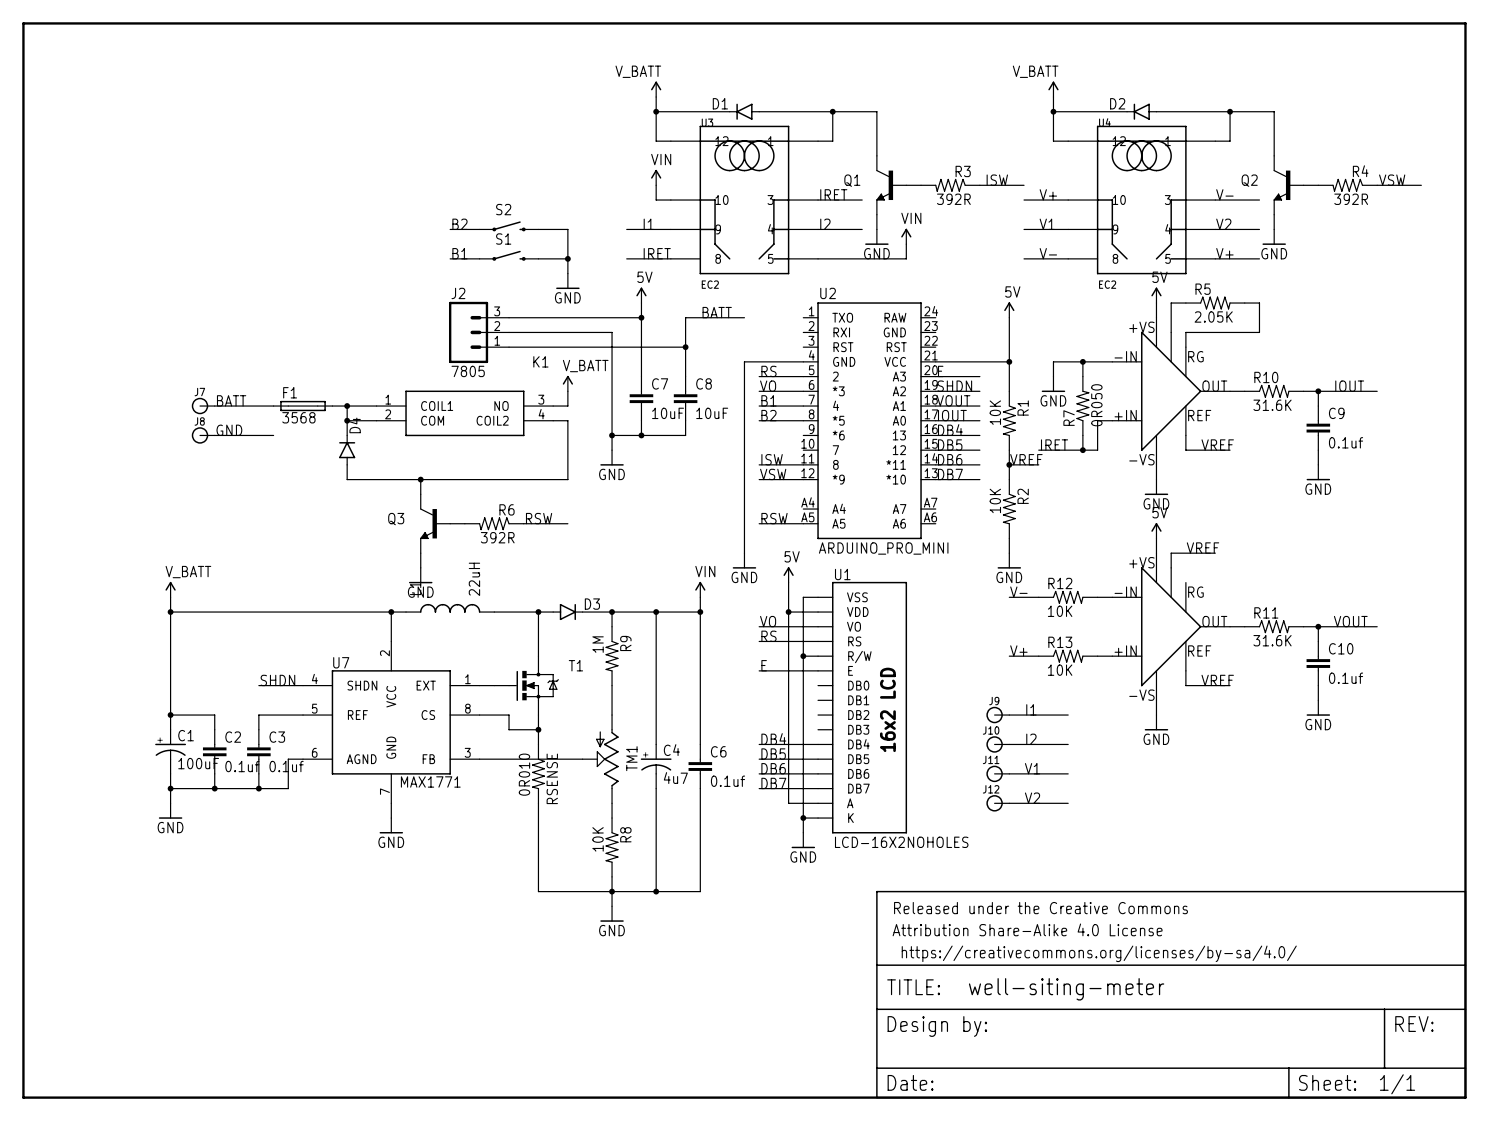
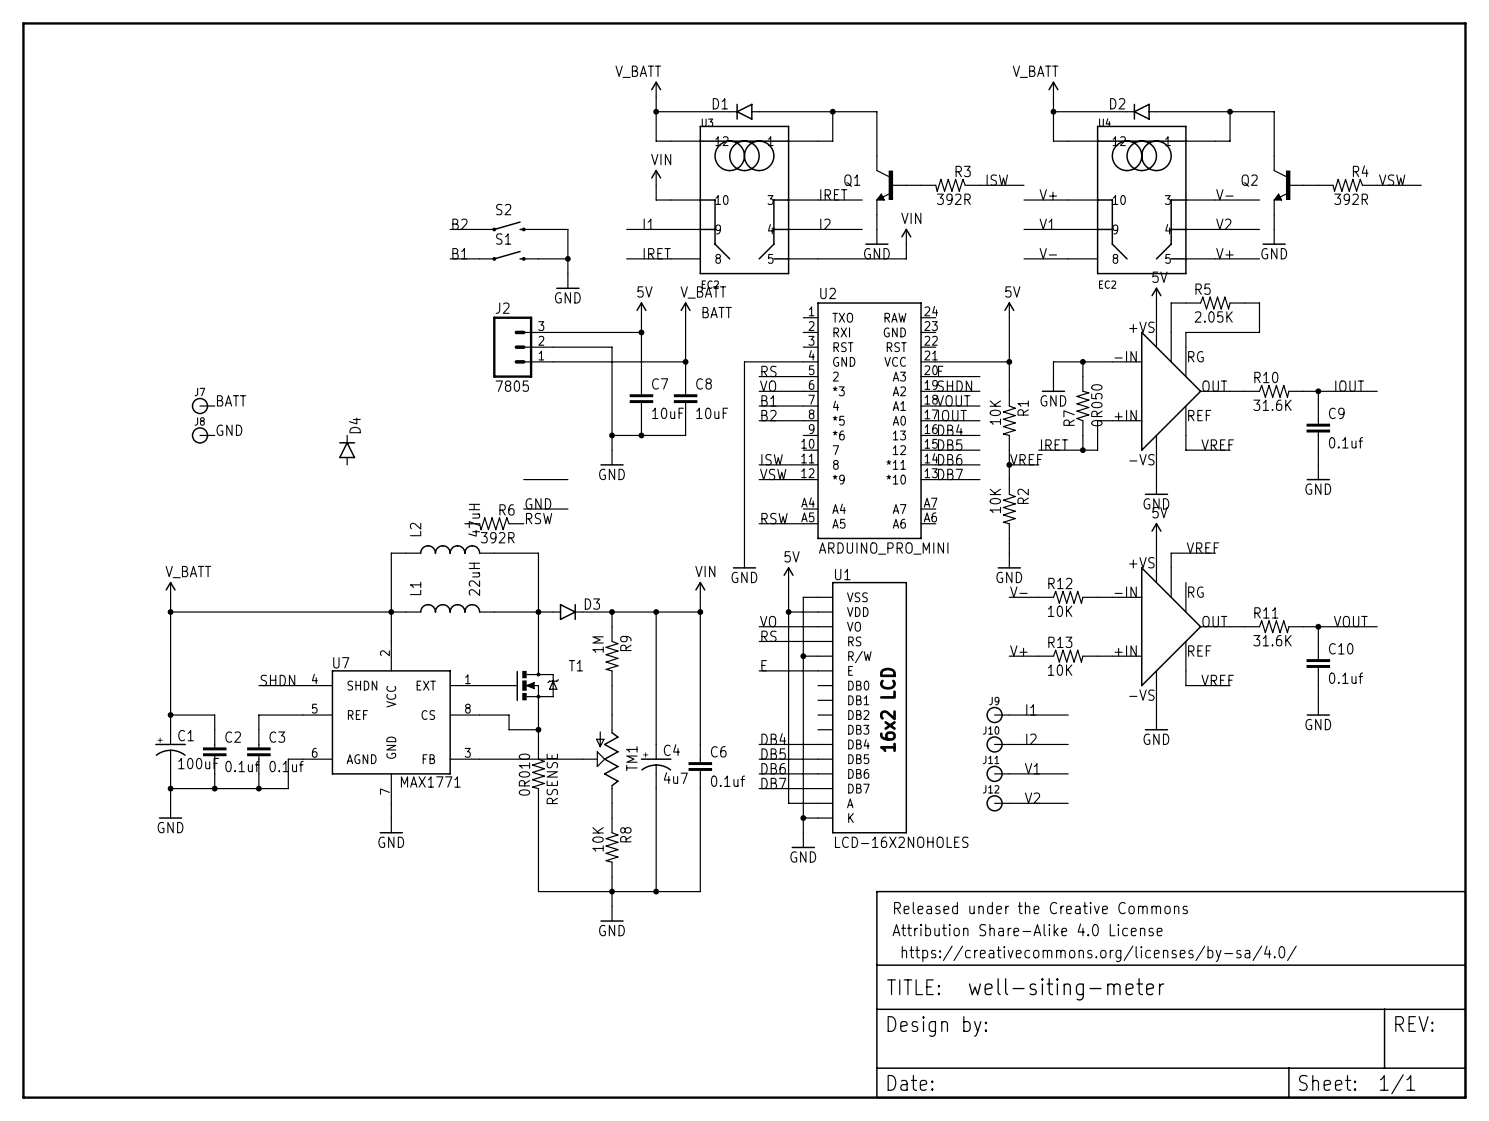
power symbol position: 5V (641, 295) -> 5V (641, 310)
wire: (641, 303) (641, 317) (509, 317) -> none
junction position: (641, 317) -> (641, 332)
wire: (685, 317) (744, 317) -> none
J2 position: (479, 332) -> (523, 347)
wire: (612, 332) (612, 347) (685, 347) -> (612, 332) (641, 332)
junction position: (685, 347) -> (685, 361)
wire: none -> (553, 361) (685, 361)
power symbol position: V_BATT (567, 383) -> V_BATT (685, 310)
wire: (567, 391) (567, 406) (553, 406) -> none
wire: (214, 406) (273, 406) -> none
F1: 3568 (303, 406) -> none
wire: (332, 406) (376, 406) -> none
wire: (347, 406) (347, 435) -> none
junction: (347, 406) -> none
K1: (464, 413) -> none
wire: (347, 420) (376, 420) -> none
junction: (347, 420) -> none
wire: (553, 420) (567, 420) (567, 479) -> none
wire: (214, 435) (273, 435) -> none
wire: (347, 464) (347, 479) (523, 479) -> none
wire: (420, 479) (420, 494) -> none
junction: (420, 479) -> none
label: none -> GND (538, 503)
Q3: (435, 523) -> none
wire: (450, 523) (464, 523) -> none
wire: (523, 523) (567, 523) -> (523, 509) (567, 509)
L2: none -> 47uH (450, 549)
wire: none -> (406, 553) (391, 553) (391, 612)
wire: (420, 553) (420, 567) -> none
wire: none -> (494, 553) (538, 553) (538, 612)
power symbol: GND (420, 575) -> none

